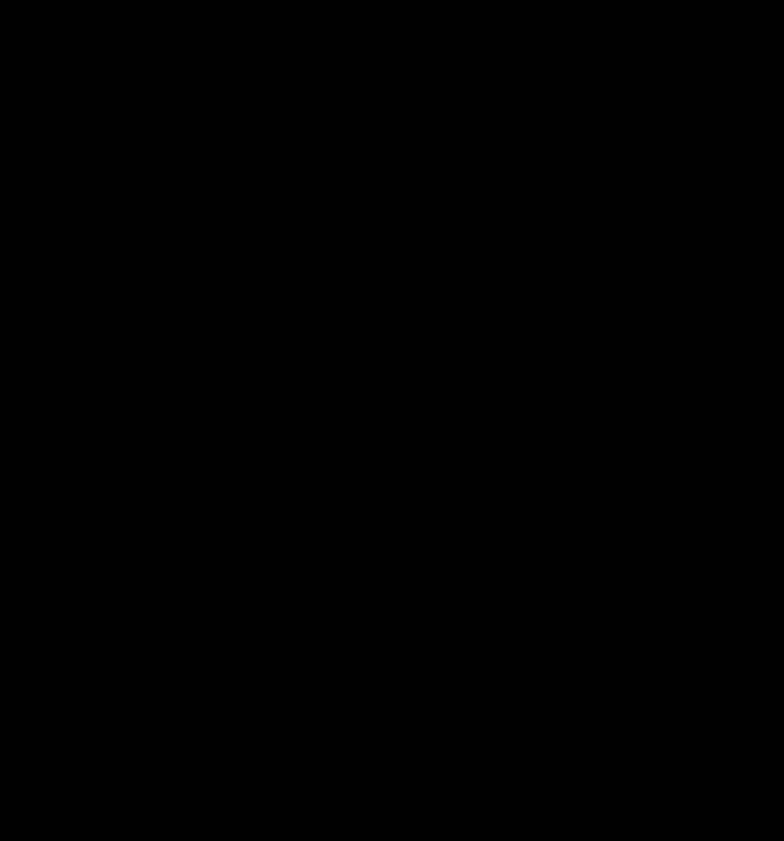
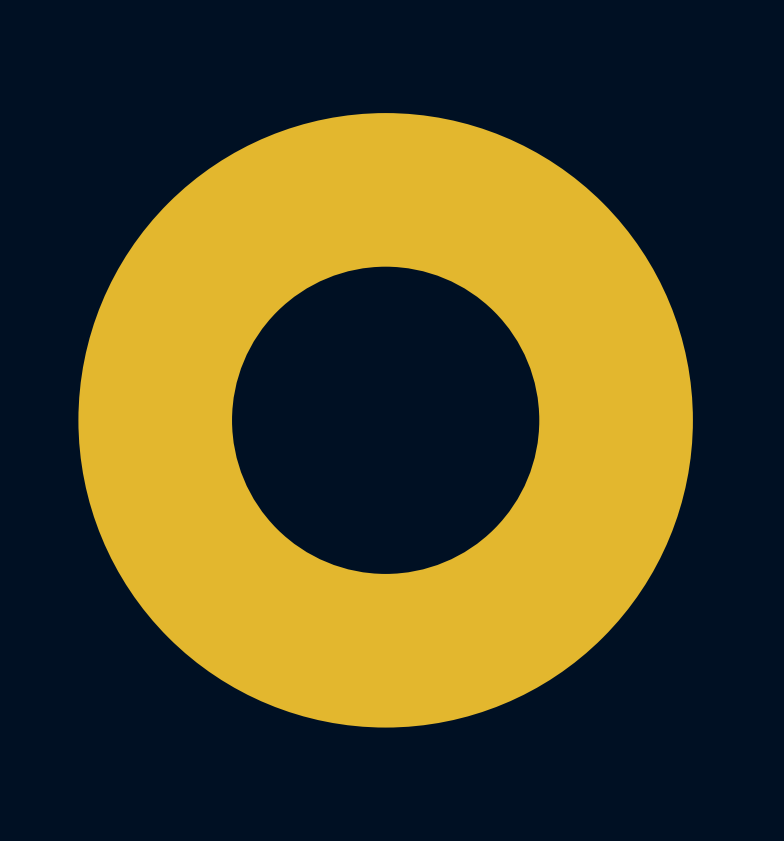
part: none -> (385, 420)

